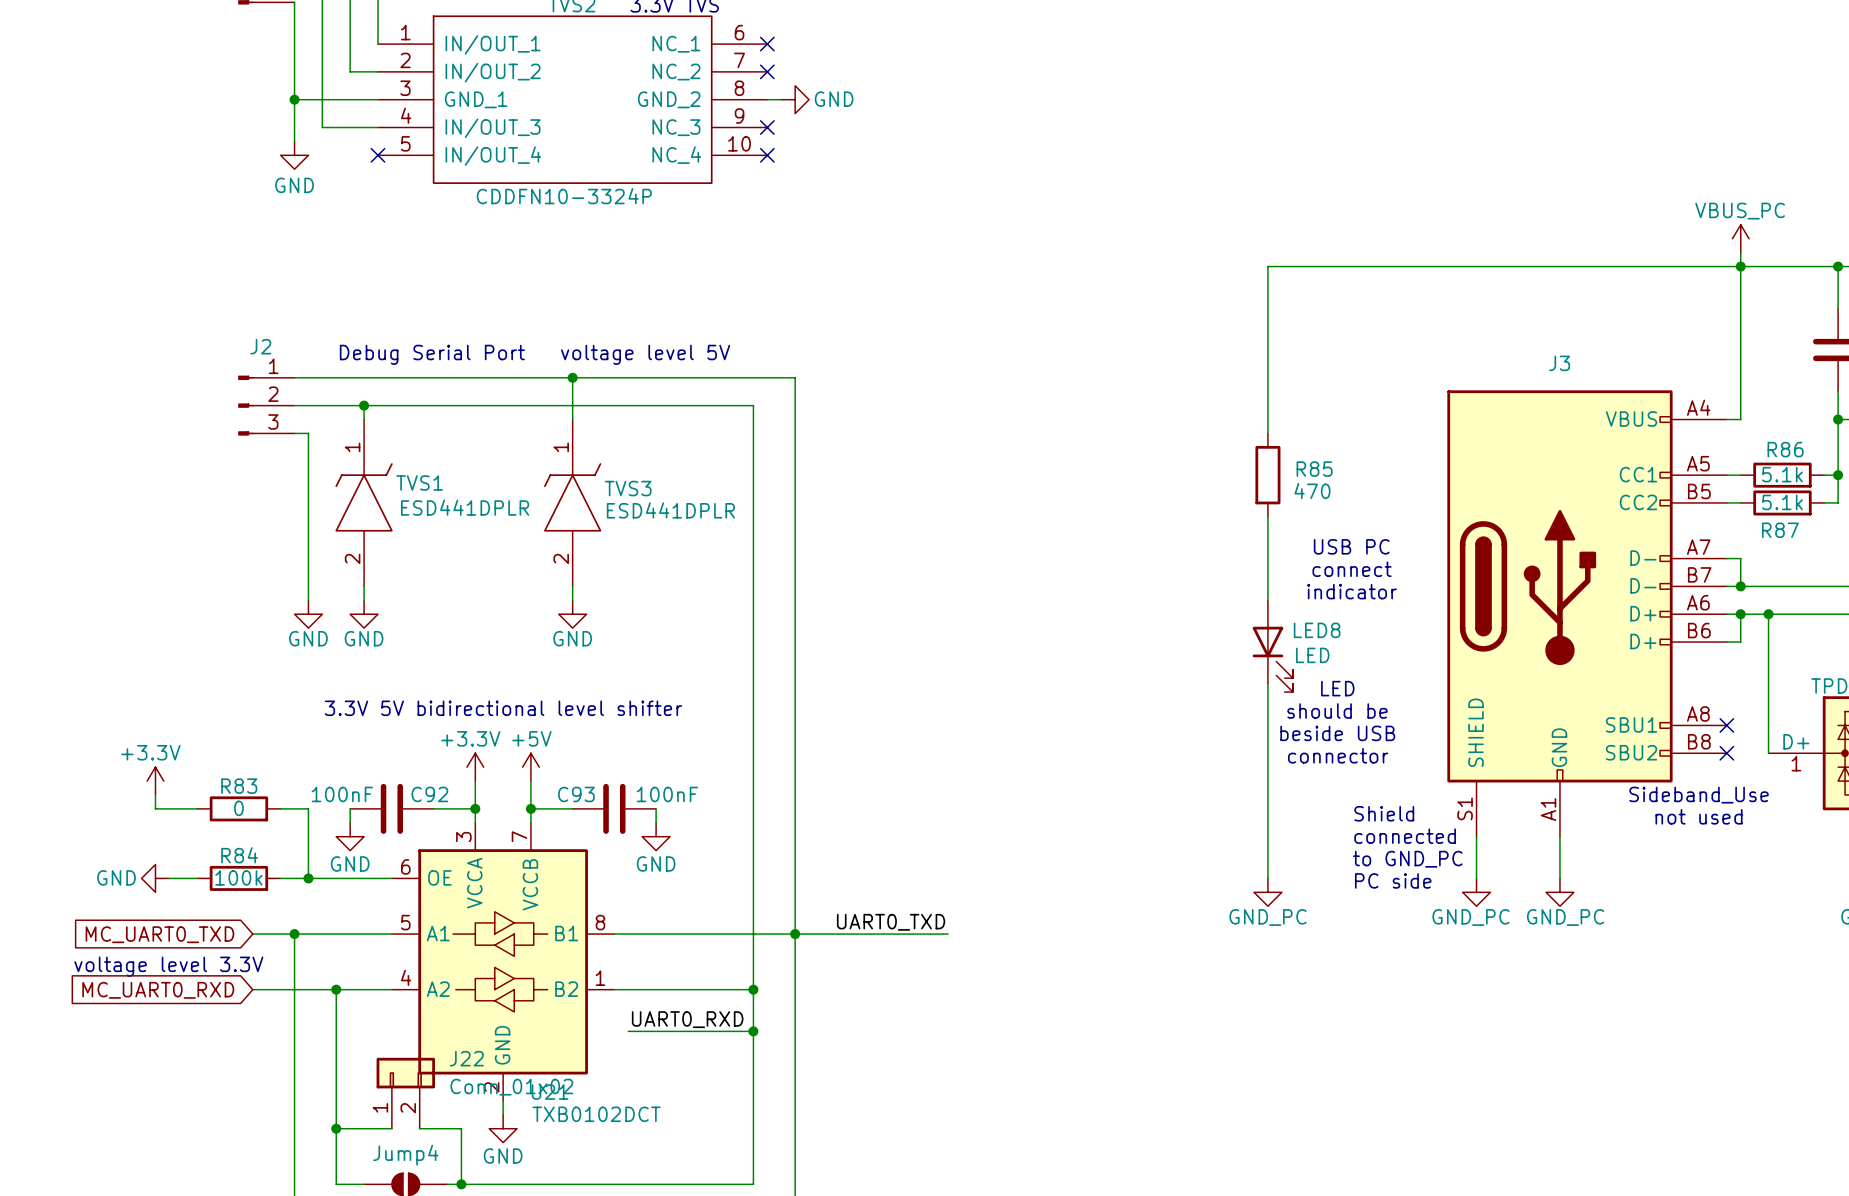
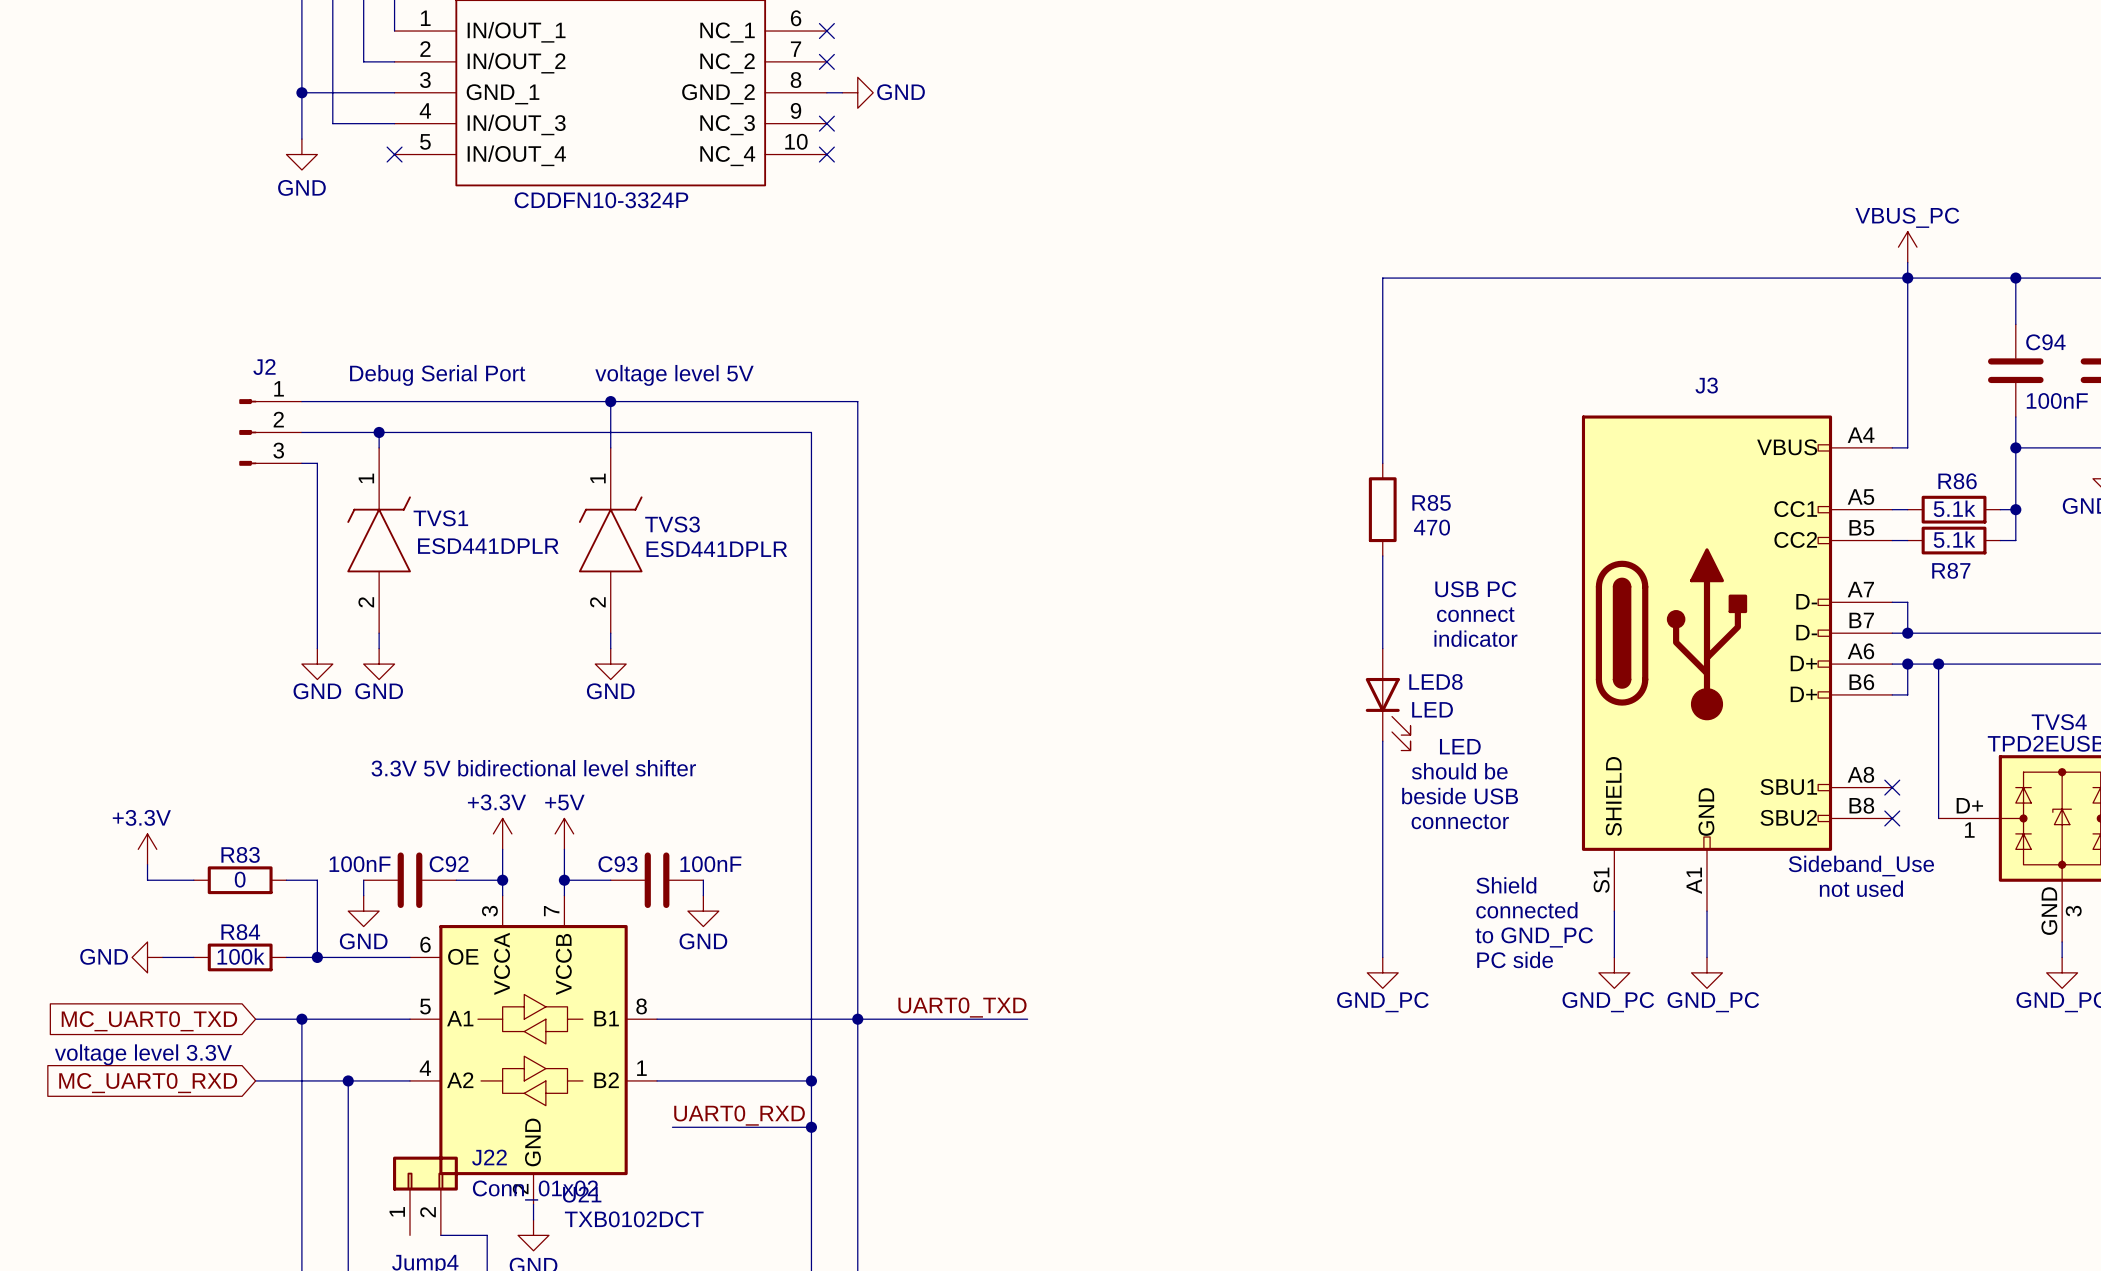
wire: (336, 1128) (391, 1128) -> none
junction: (336, 1128) -> none

